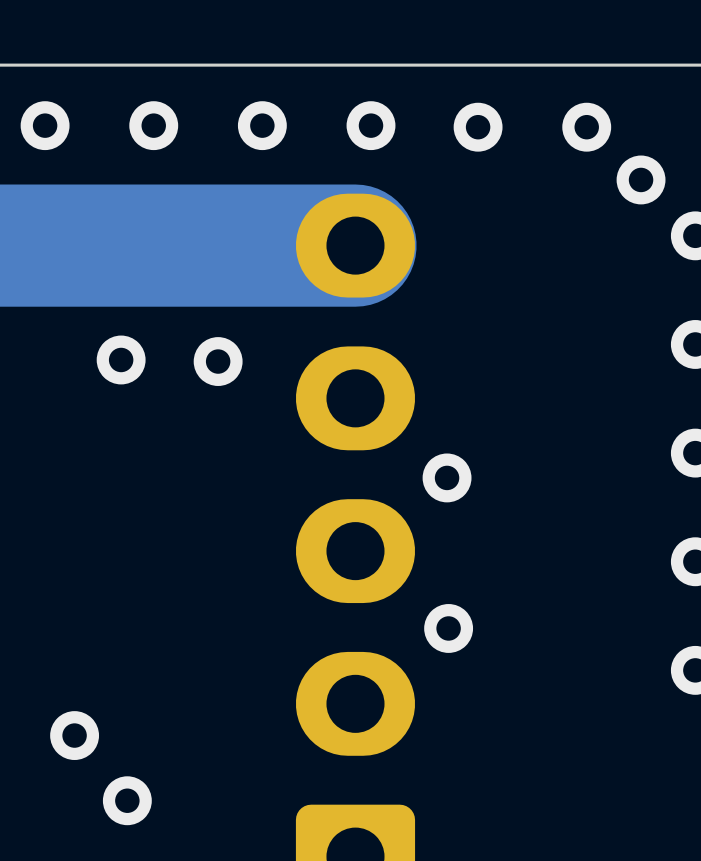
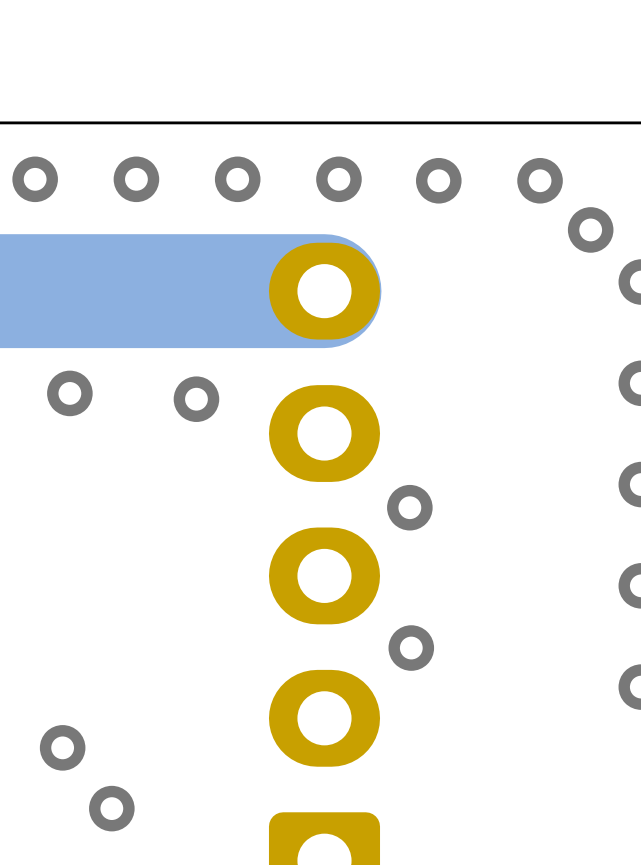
via position: (121, 359) -> (69, 393)

